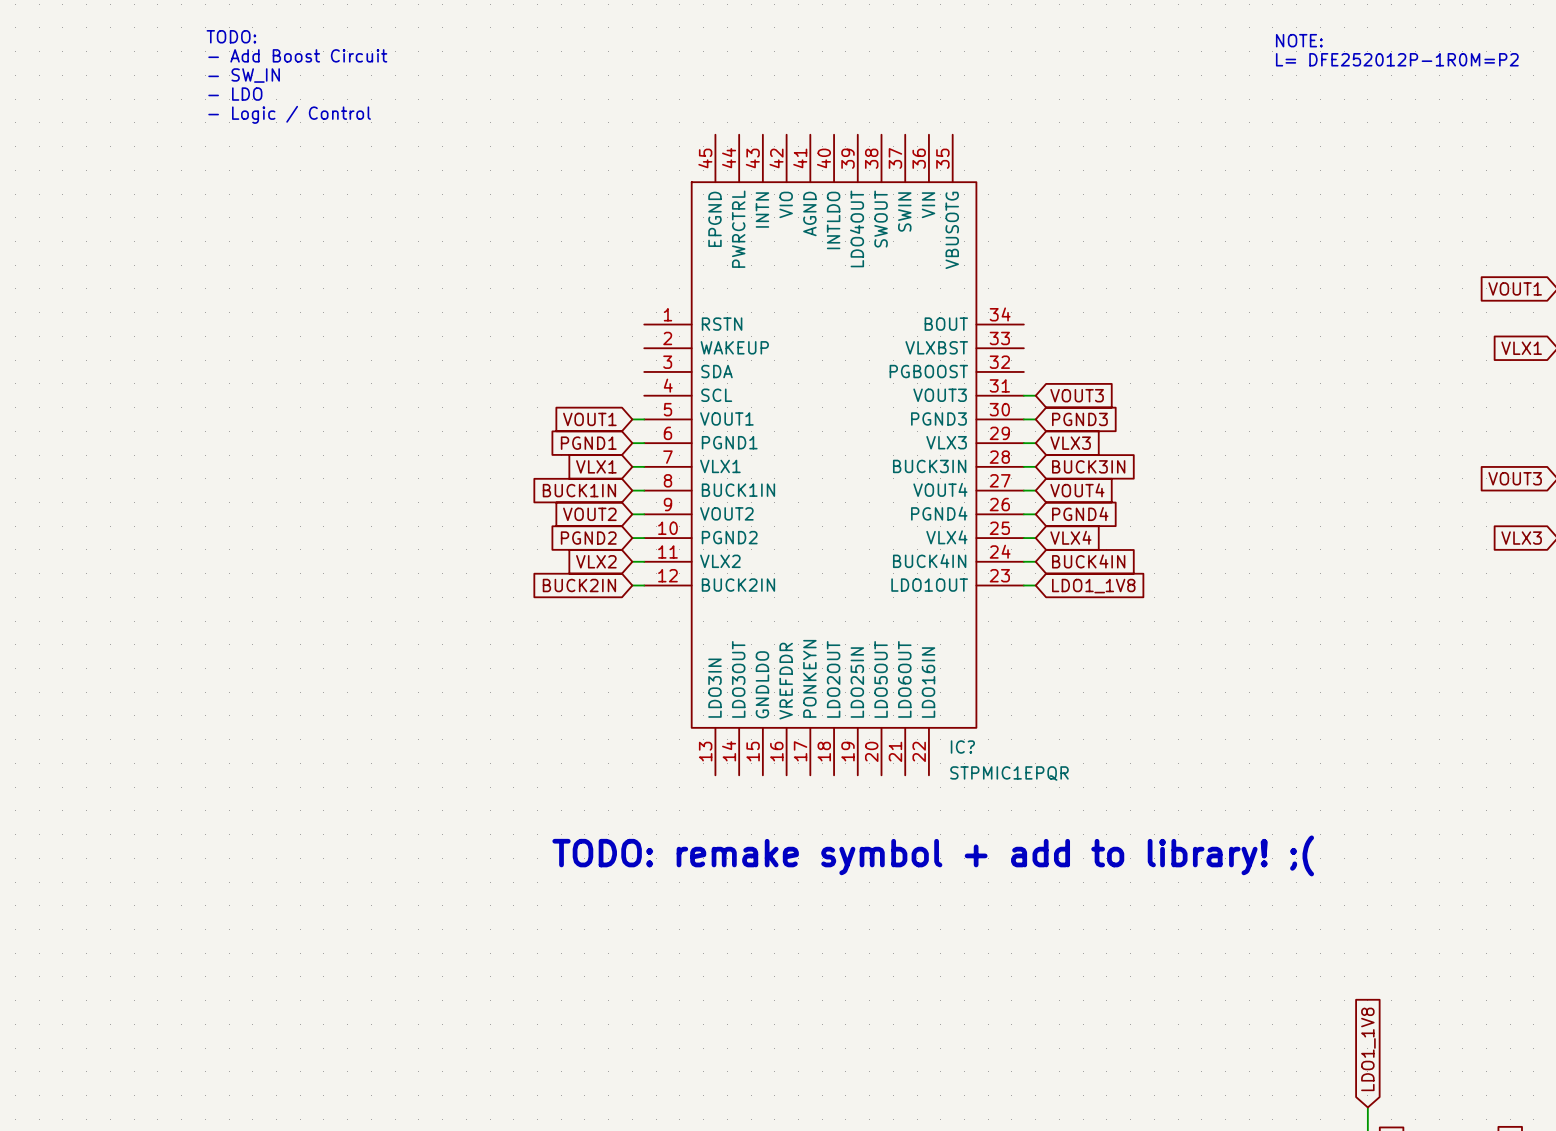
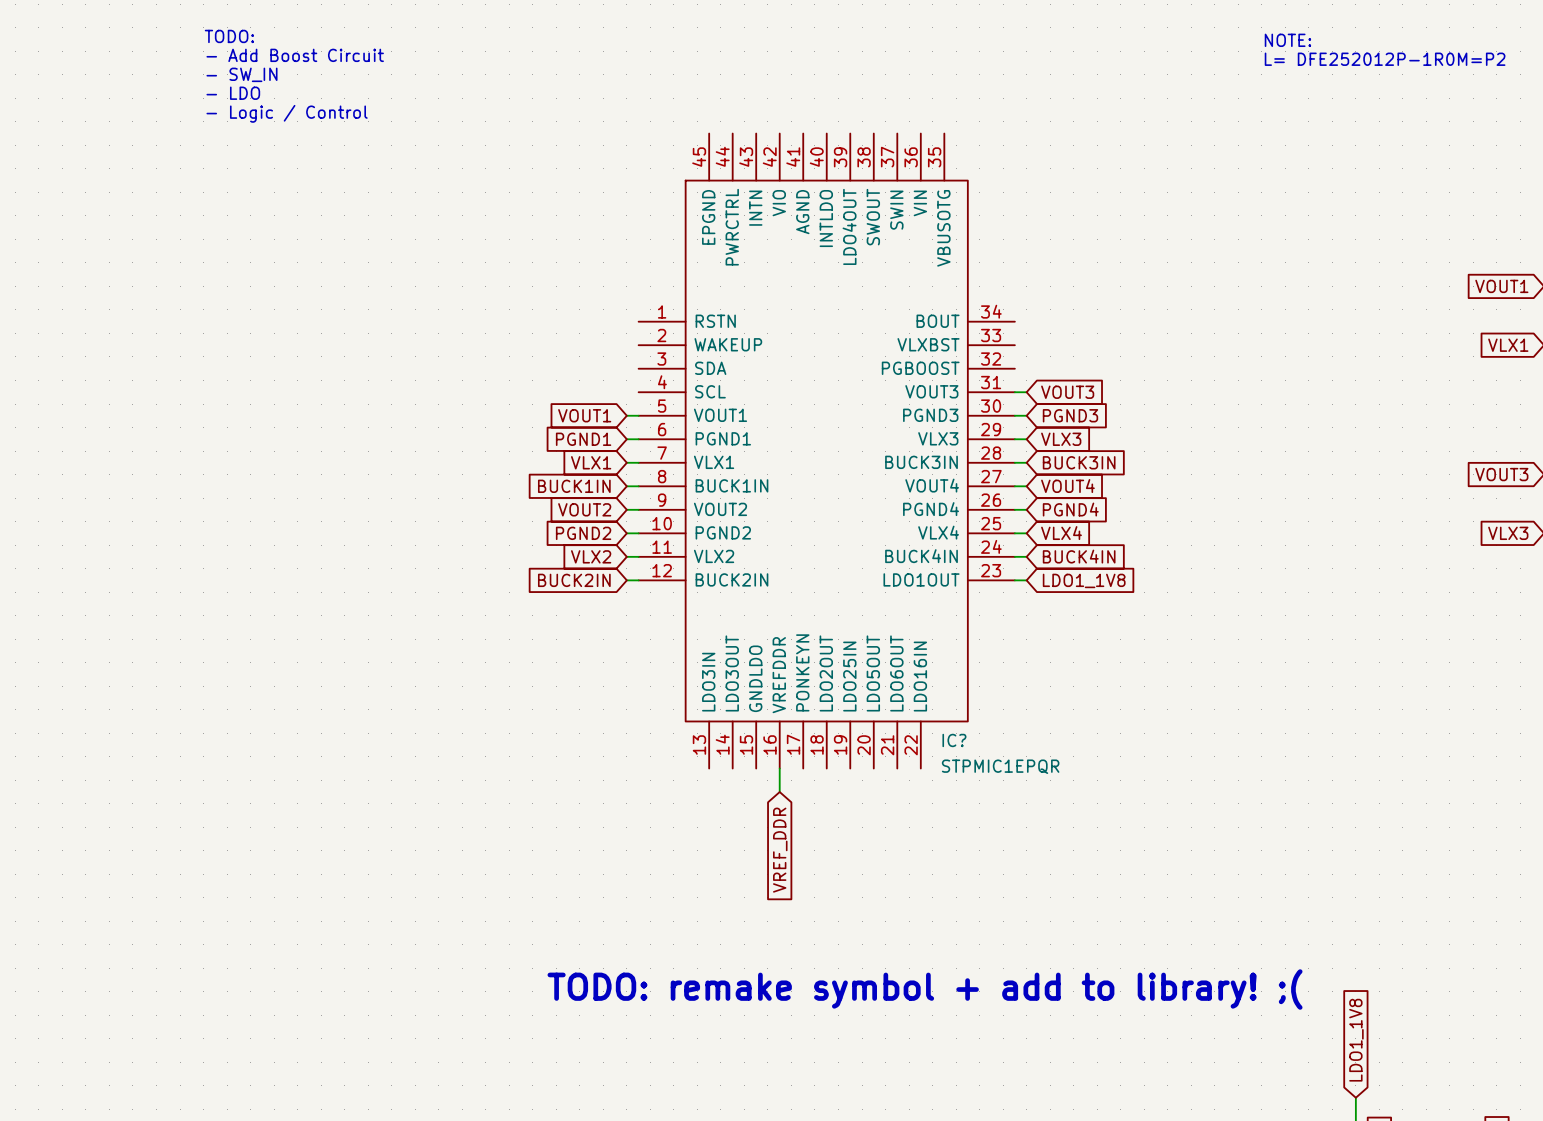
wire: none -> (779, 768) (779, 792)
text position: TODO: remake symbol + add to library! ;( (933, 855) -> TODO: remake symbol + add to library! ;( (925, 989)
global label: none -> VREF_DDR (780, 850)

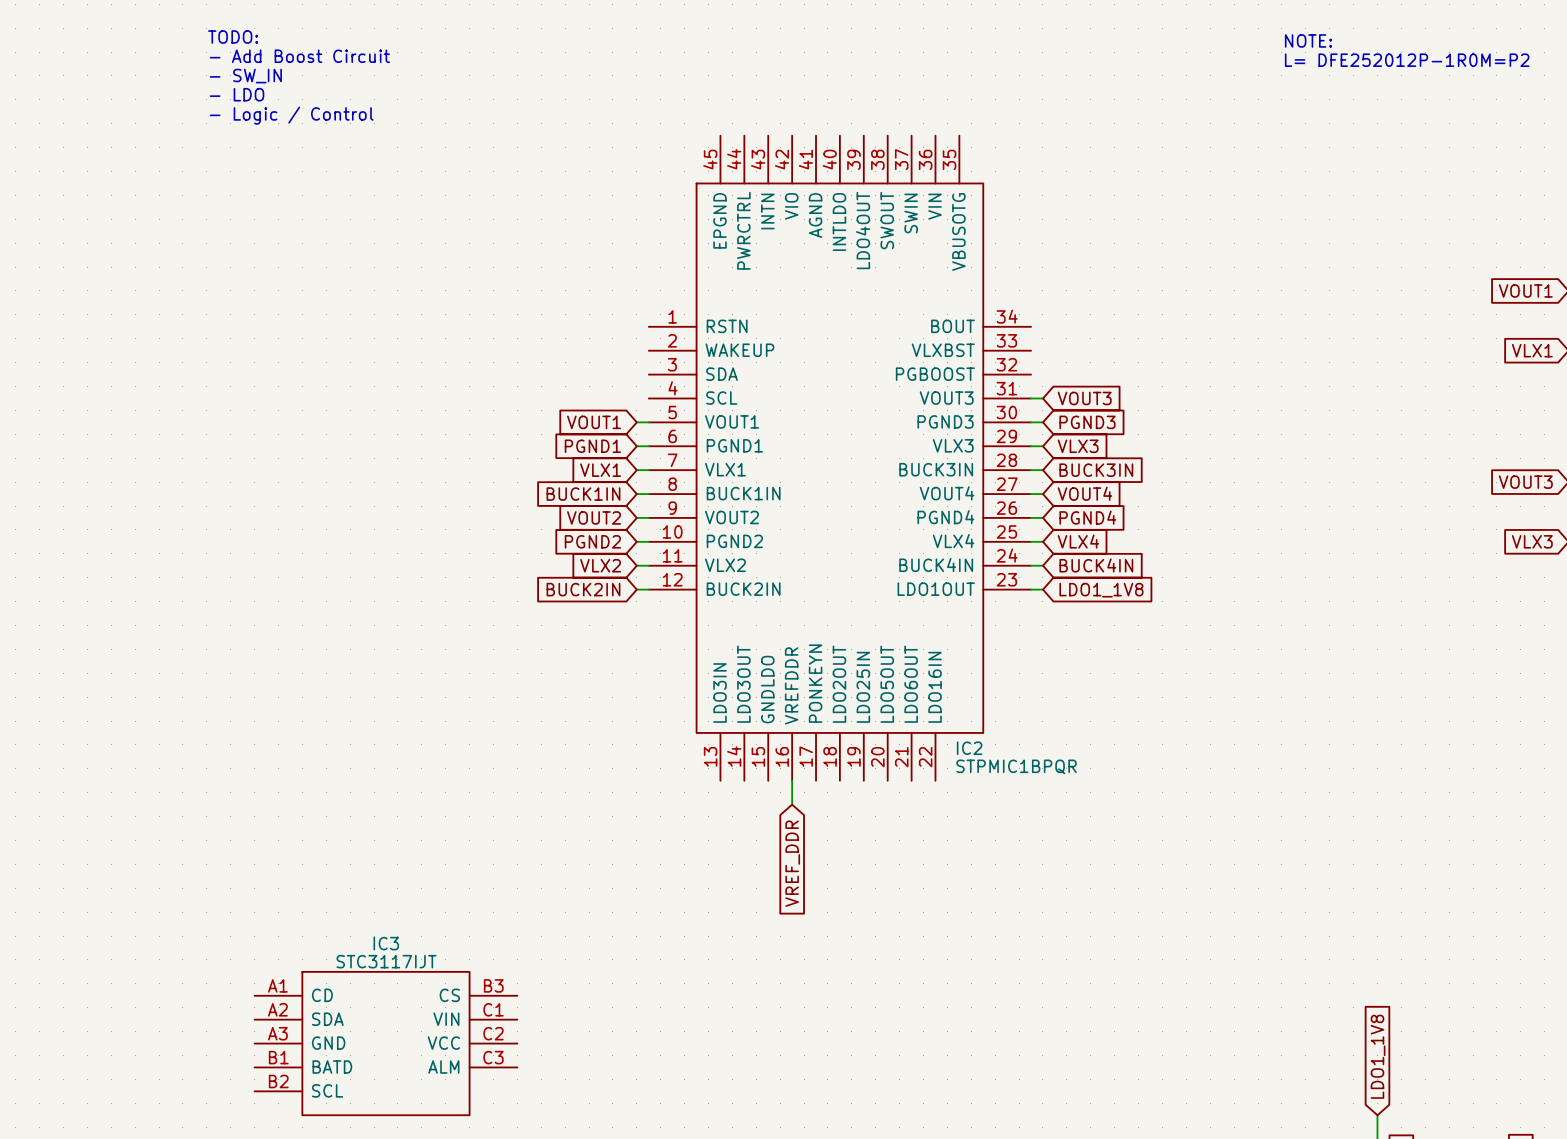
IC? name: IC? (954, 740) -> IC2 (969, 748)
IC? value: STPMIC1EPQR (1000, 766) -> STPMIC1BPQR (1016, 766)
text: TODO: remake symbol + add to library! ;( (925, 989) -> none
IC3: none -> STC3117IJT (385, 1043)

